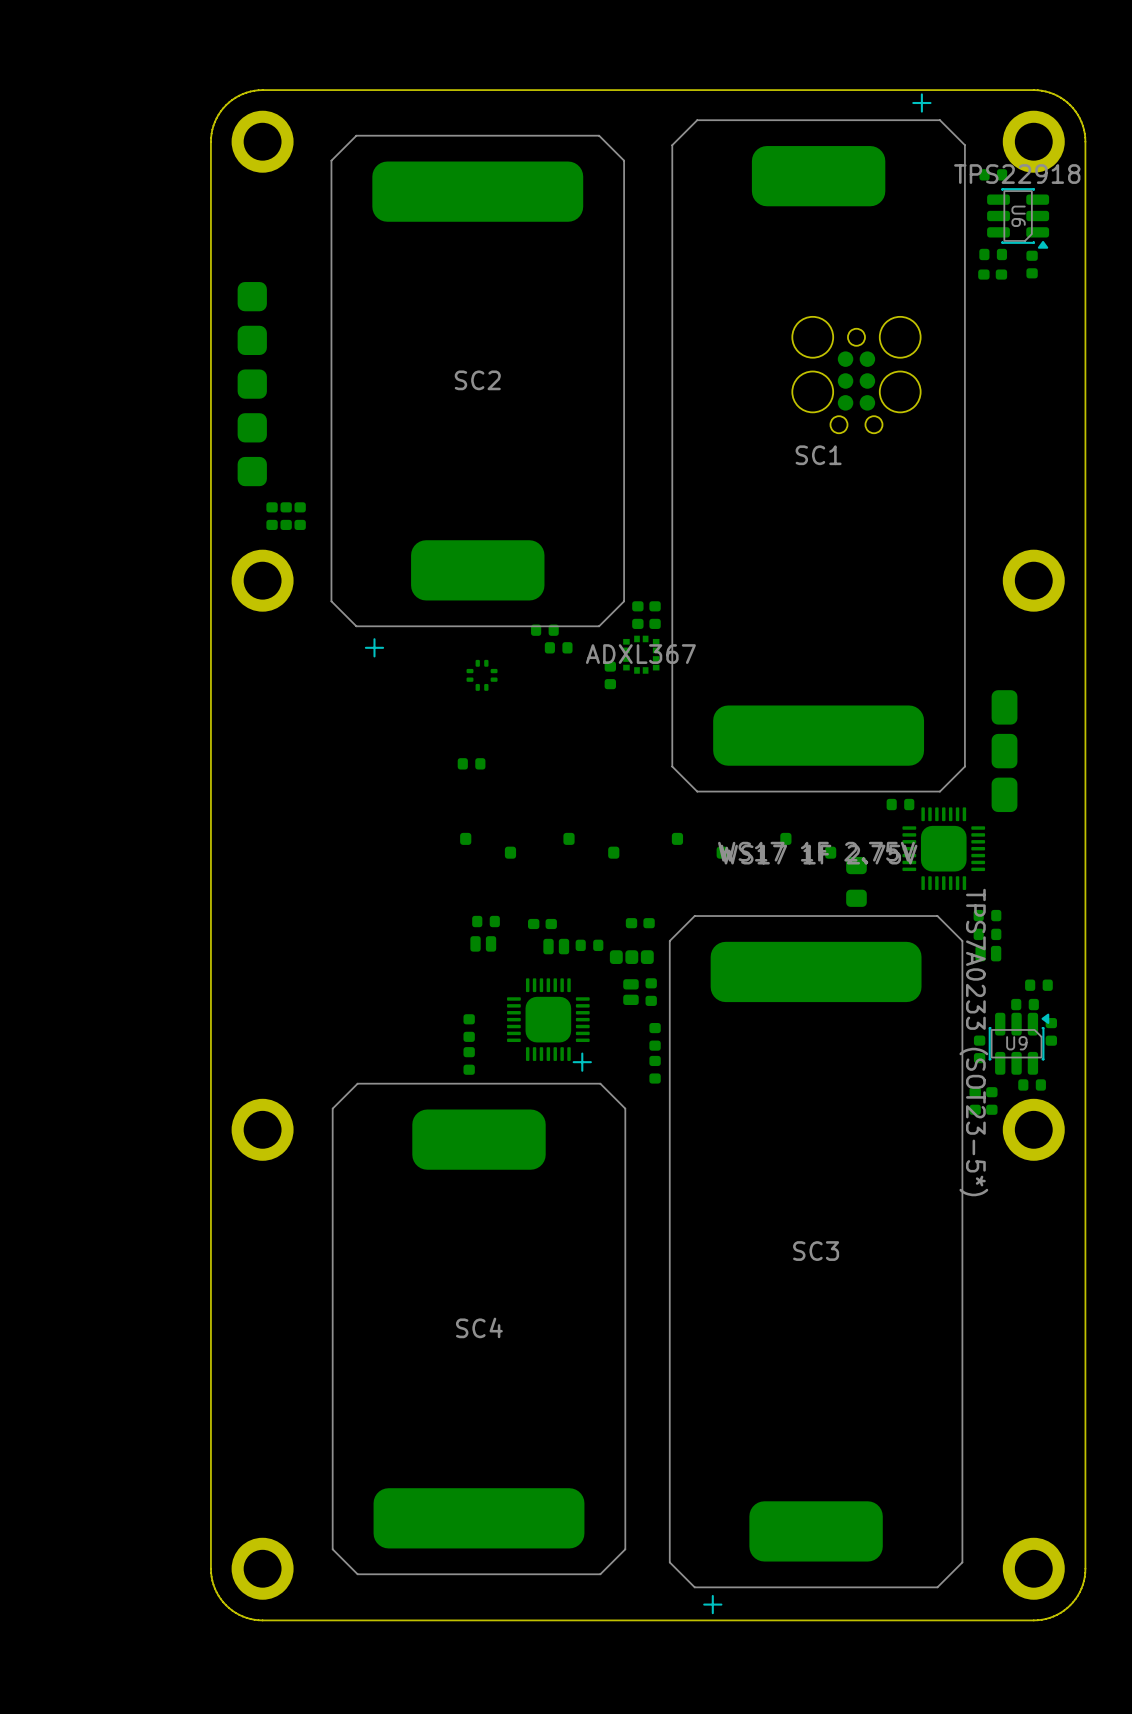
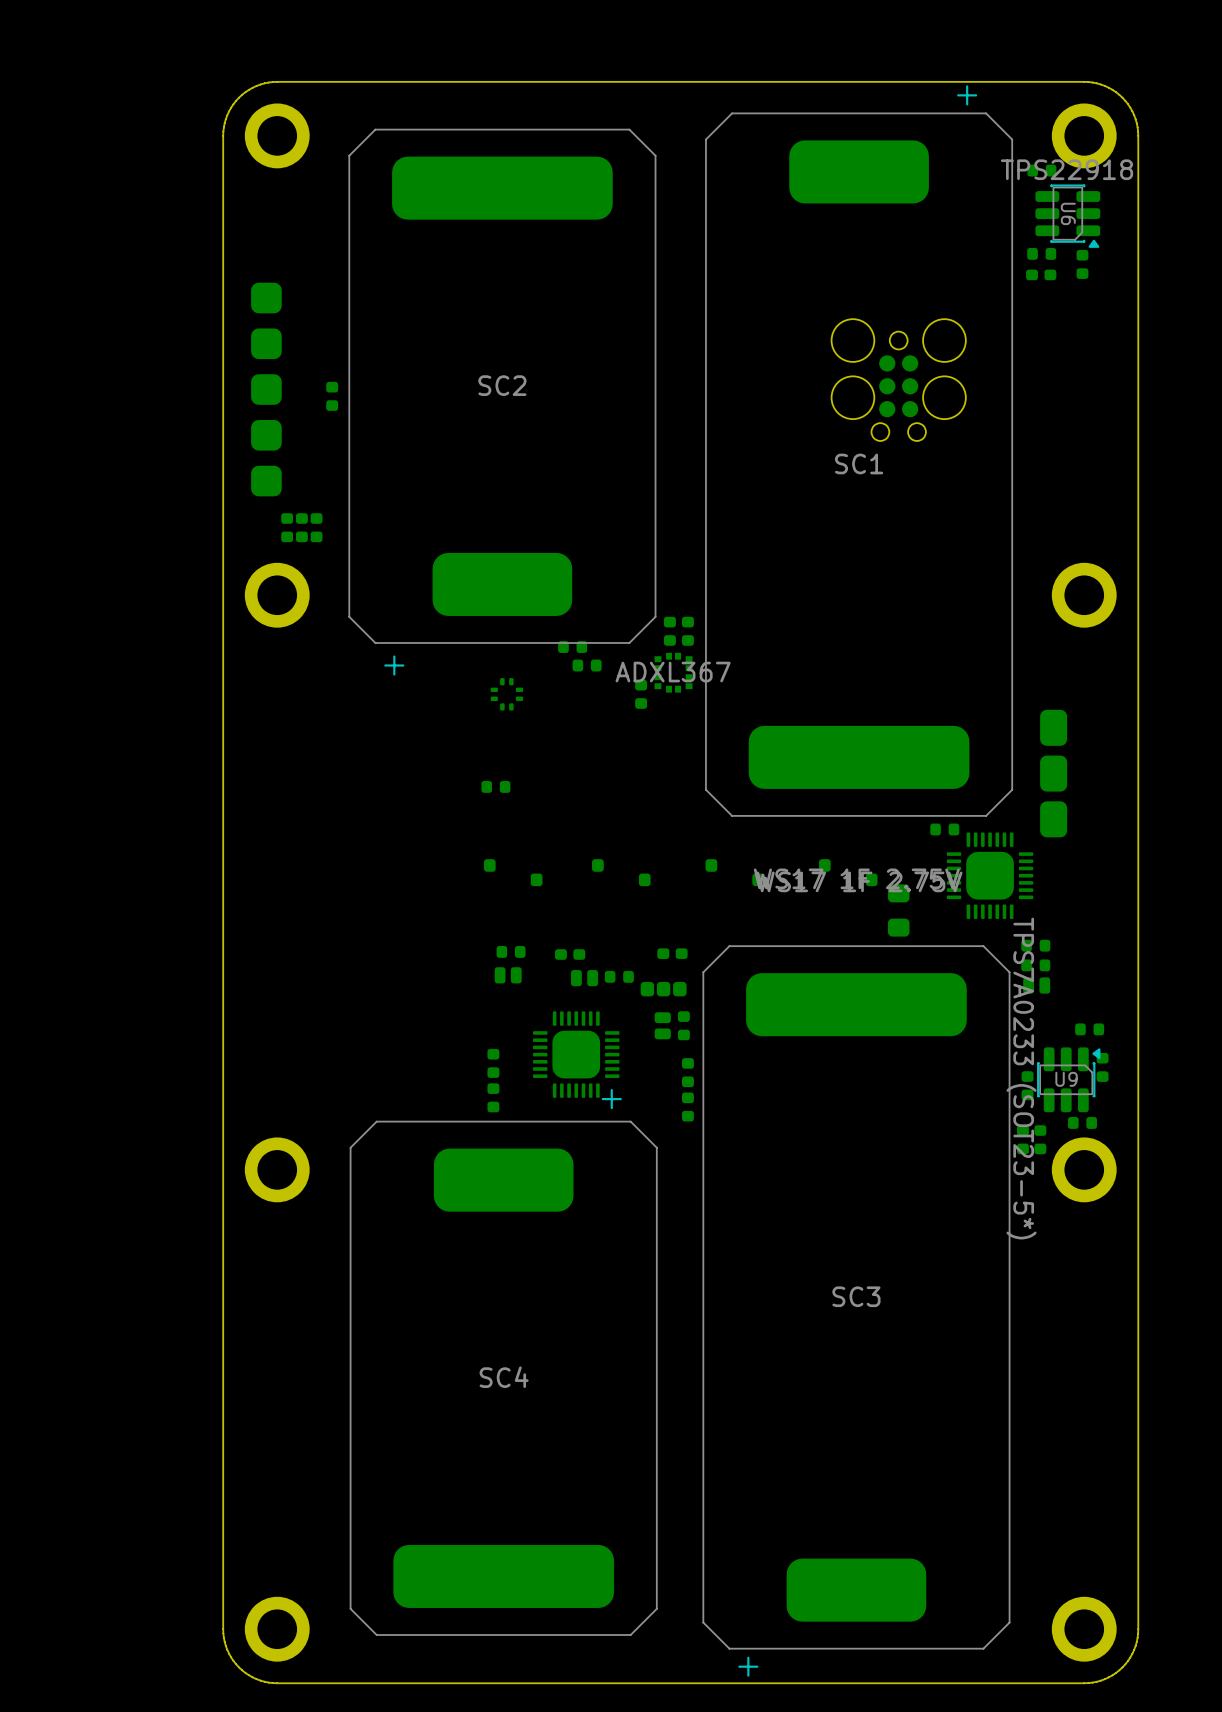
part: none -> (332, 396)
part: (1038, 985) -> none
part: none -> (1089, 1029)
part: (1025, 1004) -> none

